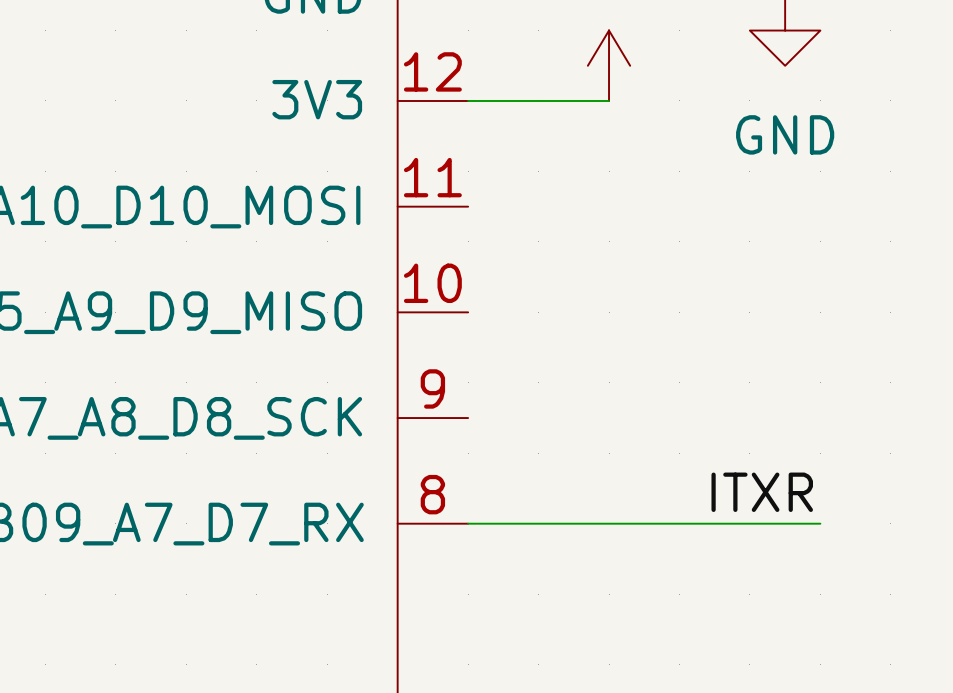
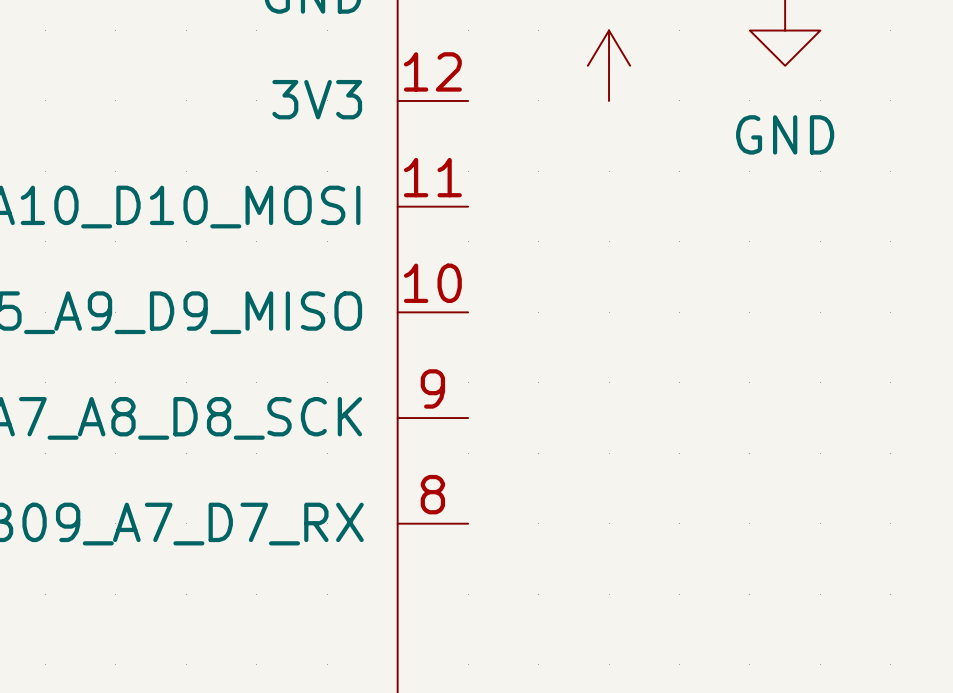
wire: (468, 100) (609, 100) -> none
label: ITXR (762, 492) -> none
wire: (468, 523) (820, 523) -> none

